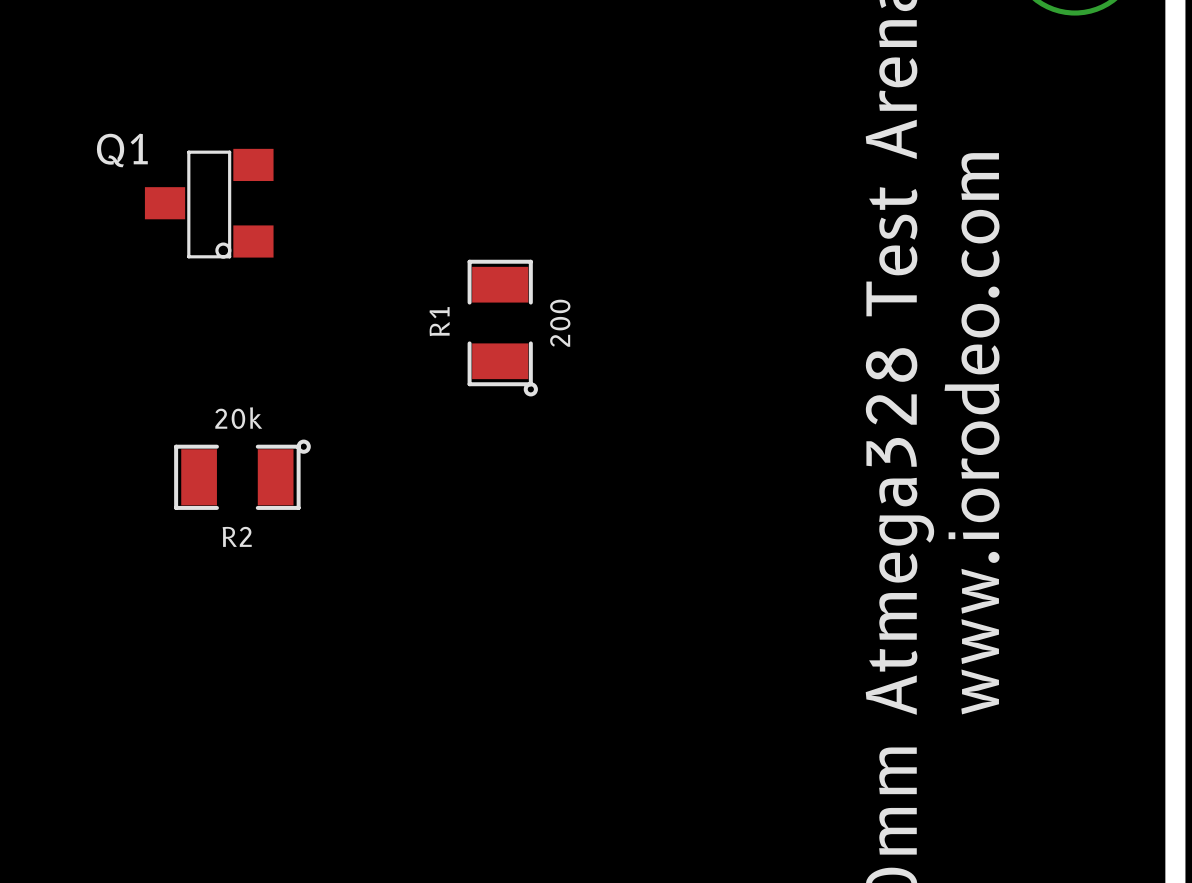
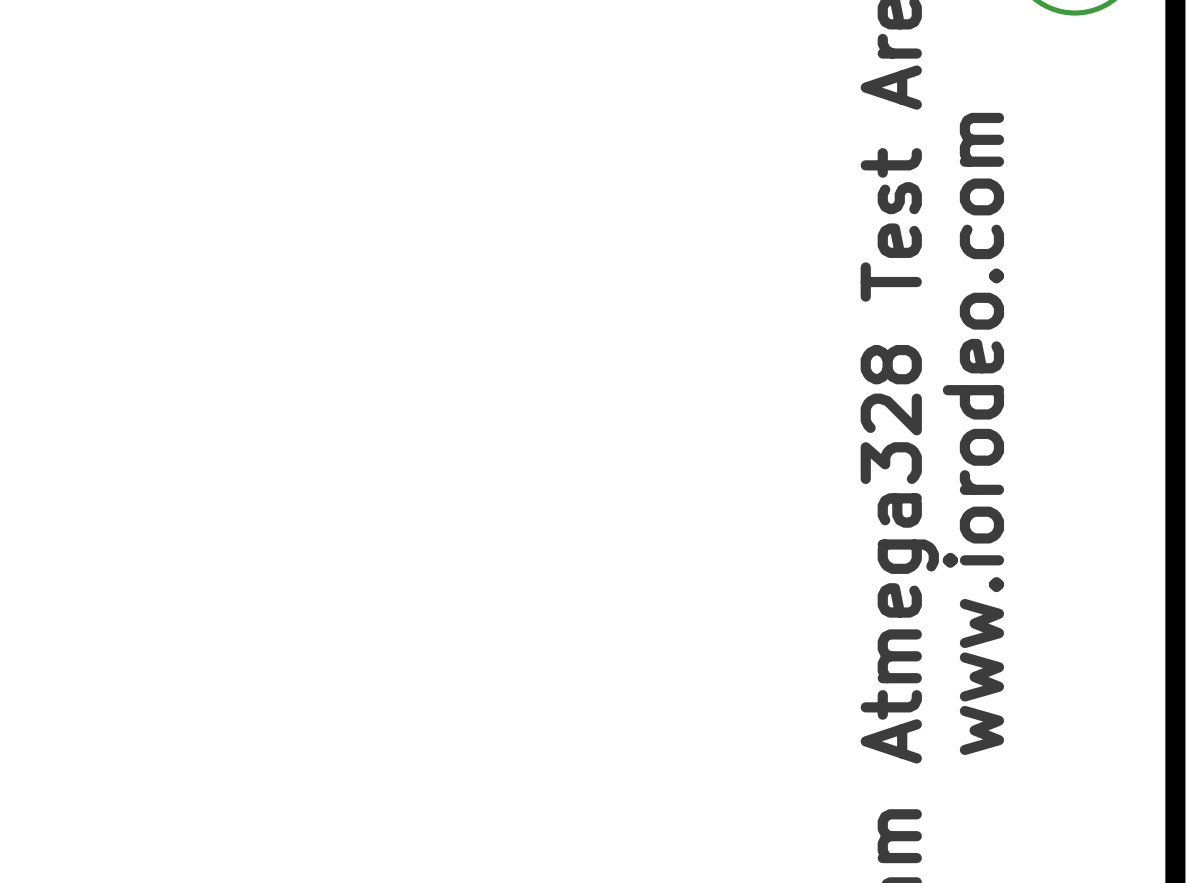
Q1: (209, 203) -> none
R1: 200 (502, 328) -> none
R2: 20k (242, 474) -> none

